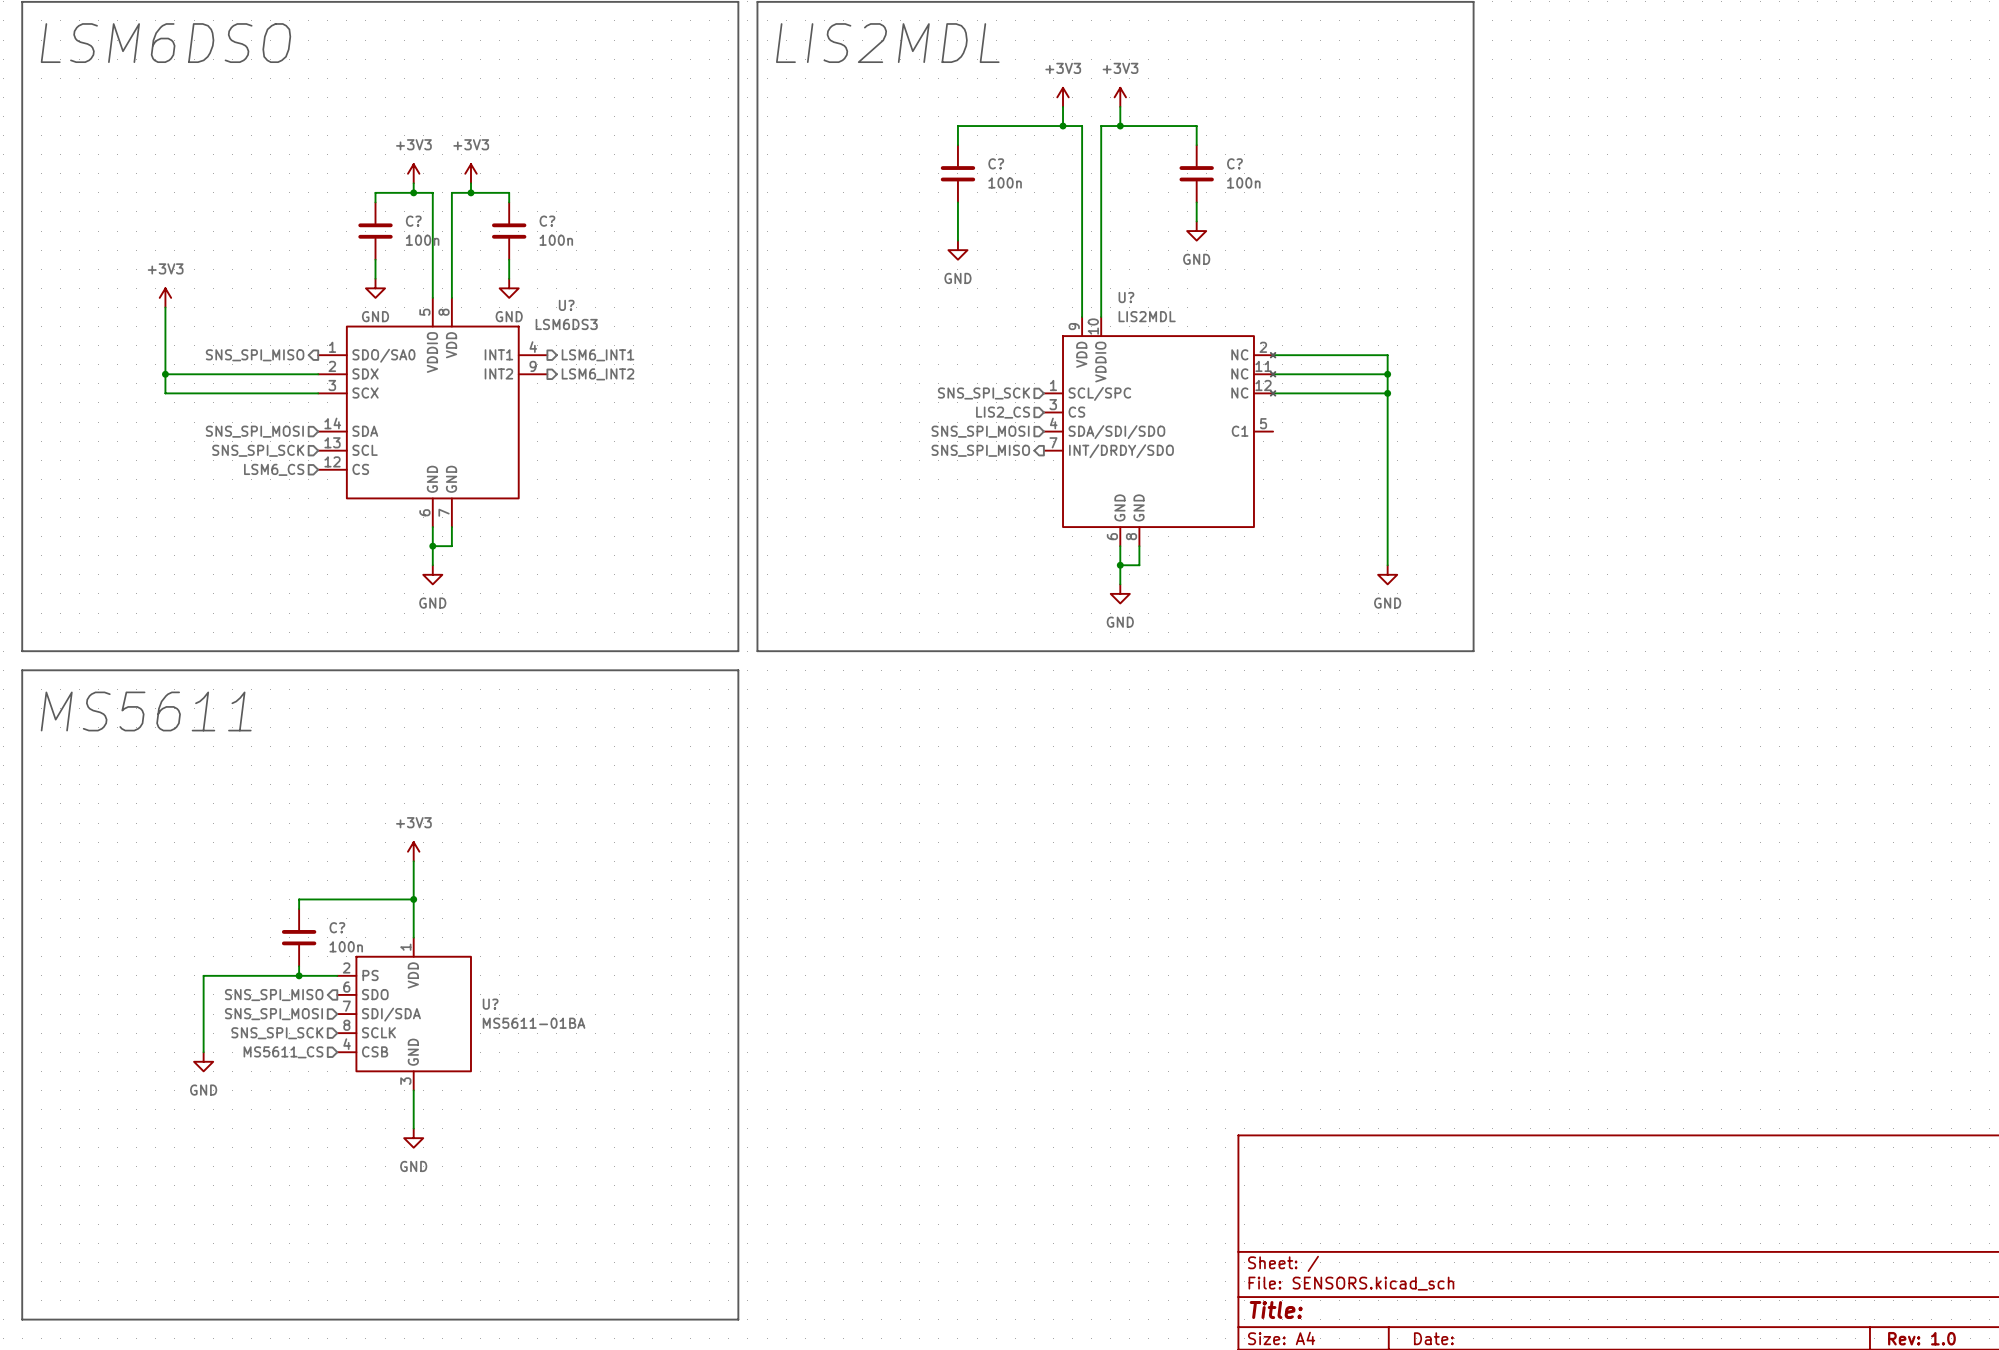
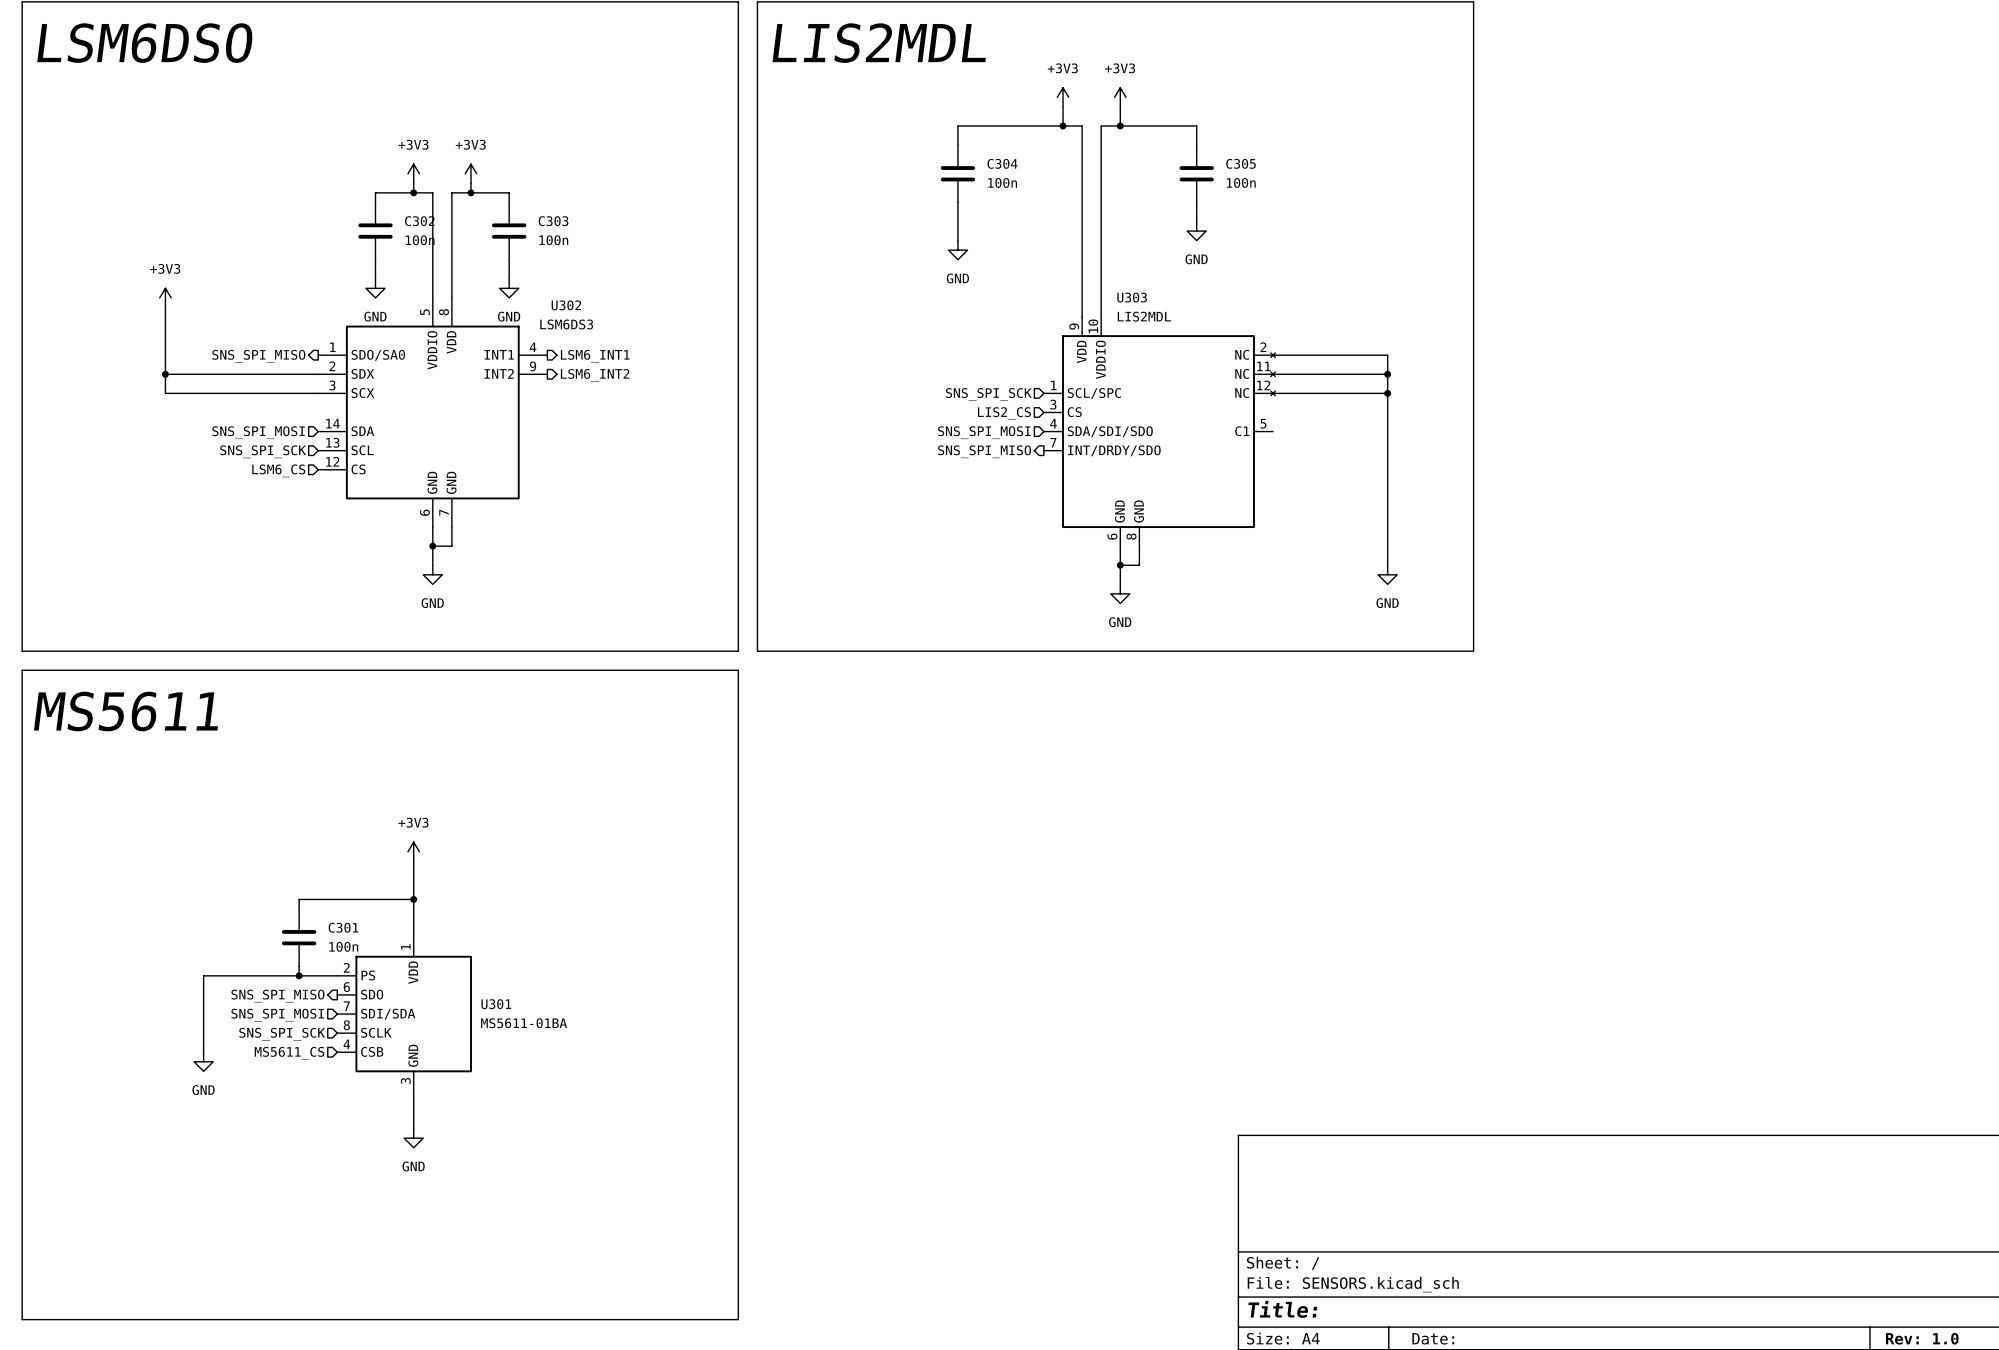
C? name: C? (996, 163) -> C304 (1002, 163)
C? name: C? (1234, 163) -> C305 (1241, 163)
C? name: C? (413, 221) -> C302 (419, 221)
C? name: C? (547, 221) -> C303 (553, 221)
U? name: U? (1126, 297) -> U303 (1132, 297)
U? name: U? (566, 305) -> U302 (566, 305)
C? name: C? (337, 927) -> C301 (343, 927)
U? name: U? (490, 1004) -> U301 (496, 1004)

